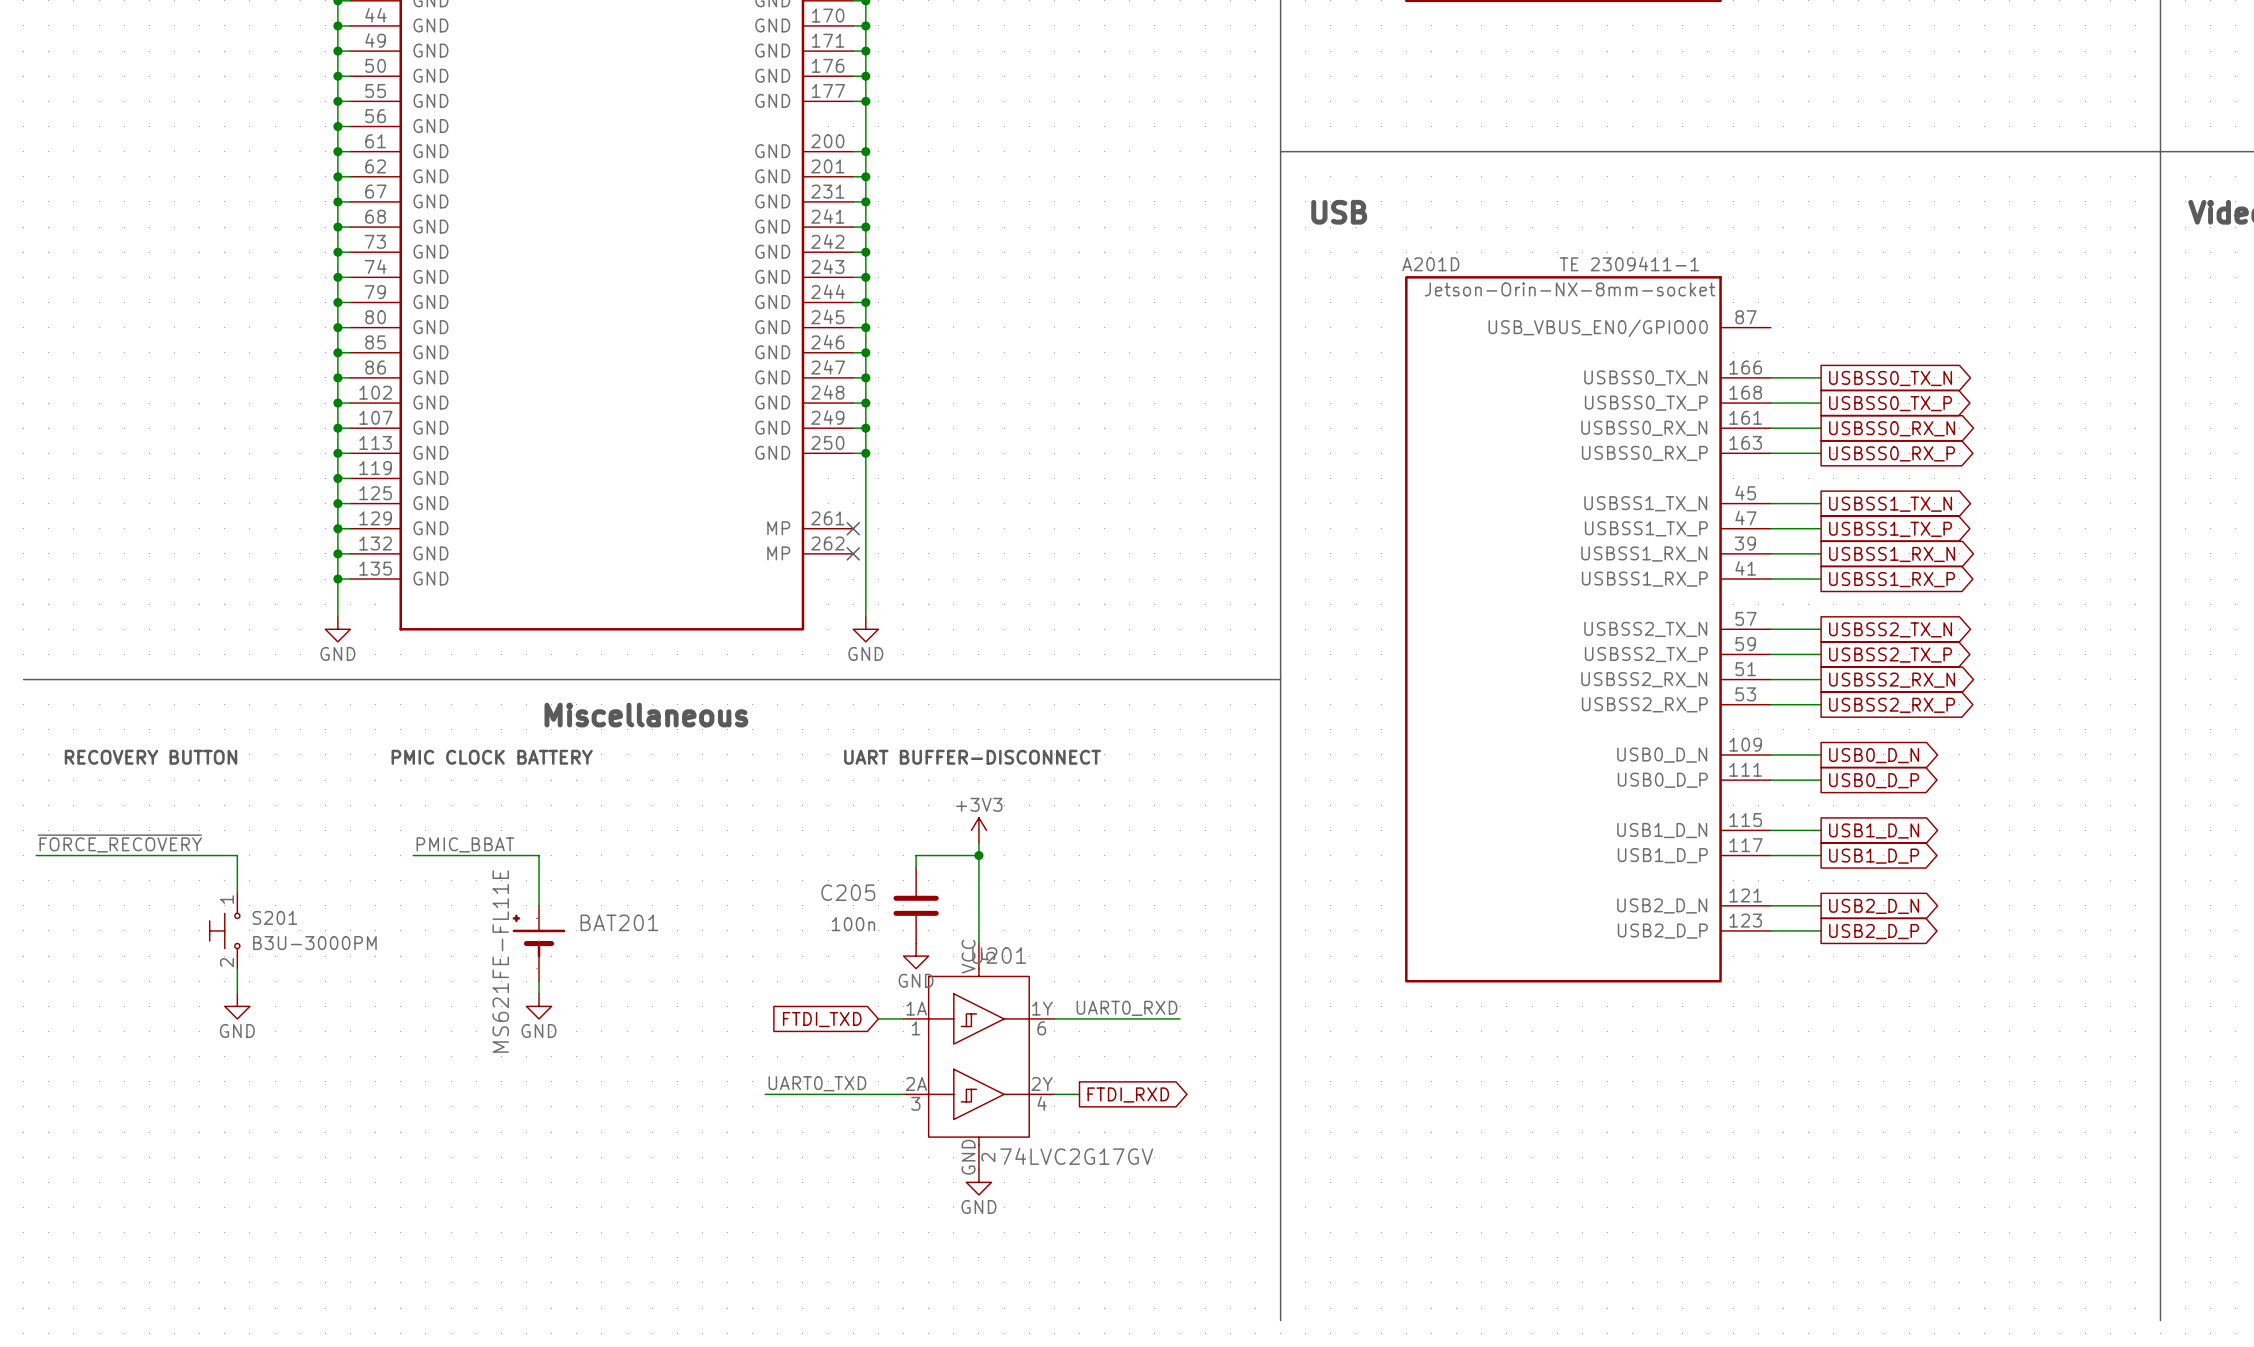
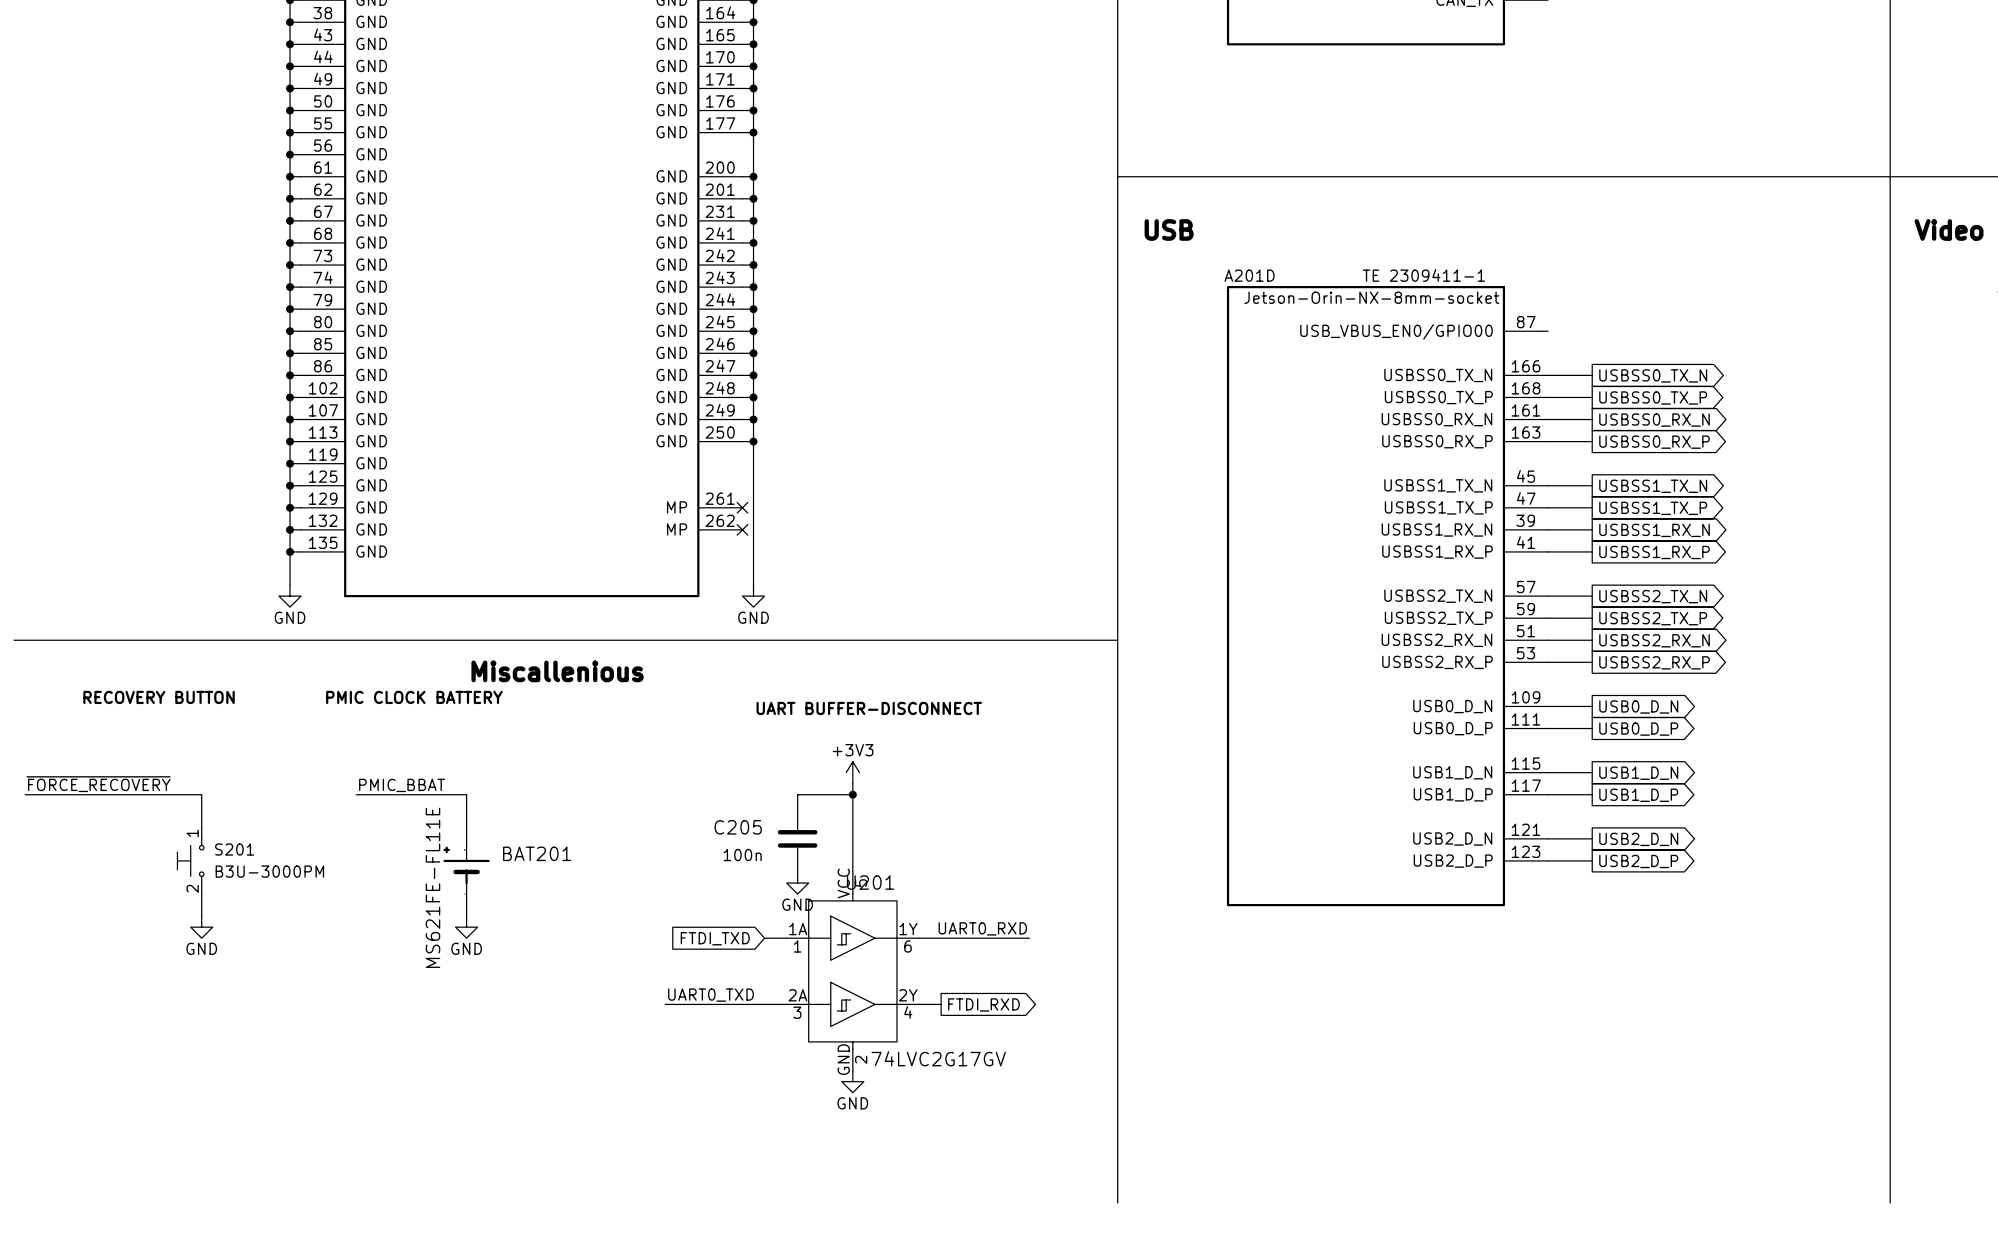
text: Miscellaneous (646, 715) -> Miscallenious (557, 671)
text position: RECOVERY BUTTON (151, 757) -> RECOVERY BUTTON (159, 697)
text position: PMIC CLOCK BATTERY (492, 757) -> PMIC CLOCK BATTERY (414, 697)
text position: UART BUFFER-DISCONNECT (972, 757) -> UART BUFFER-DISCONNECT (869, 708)

